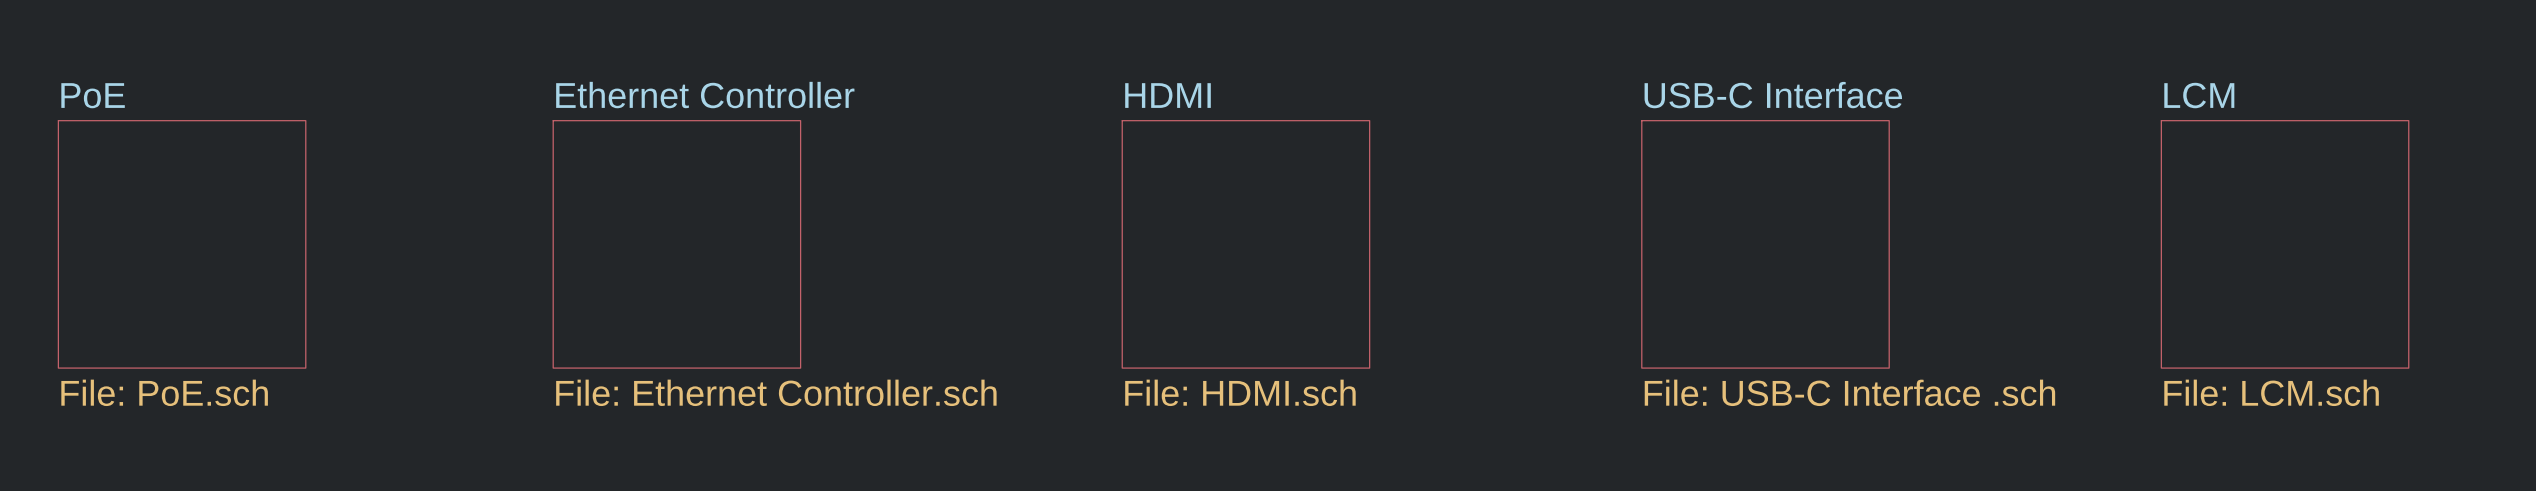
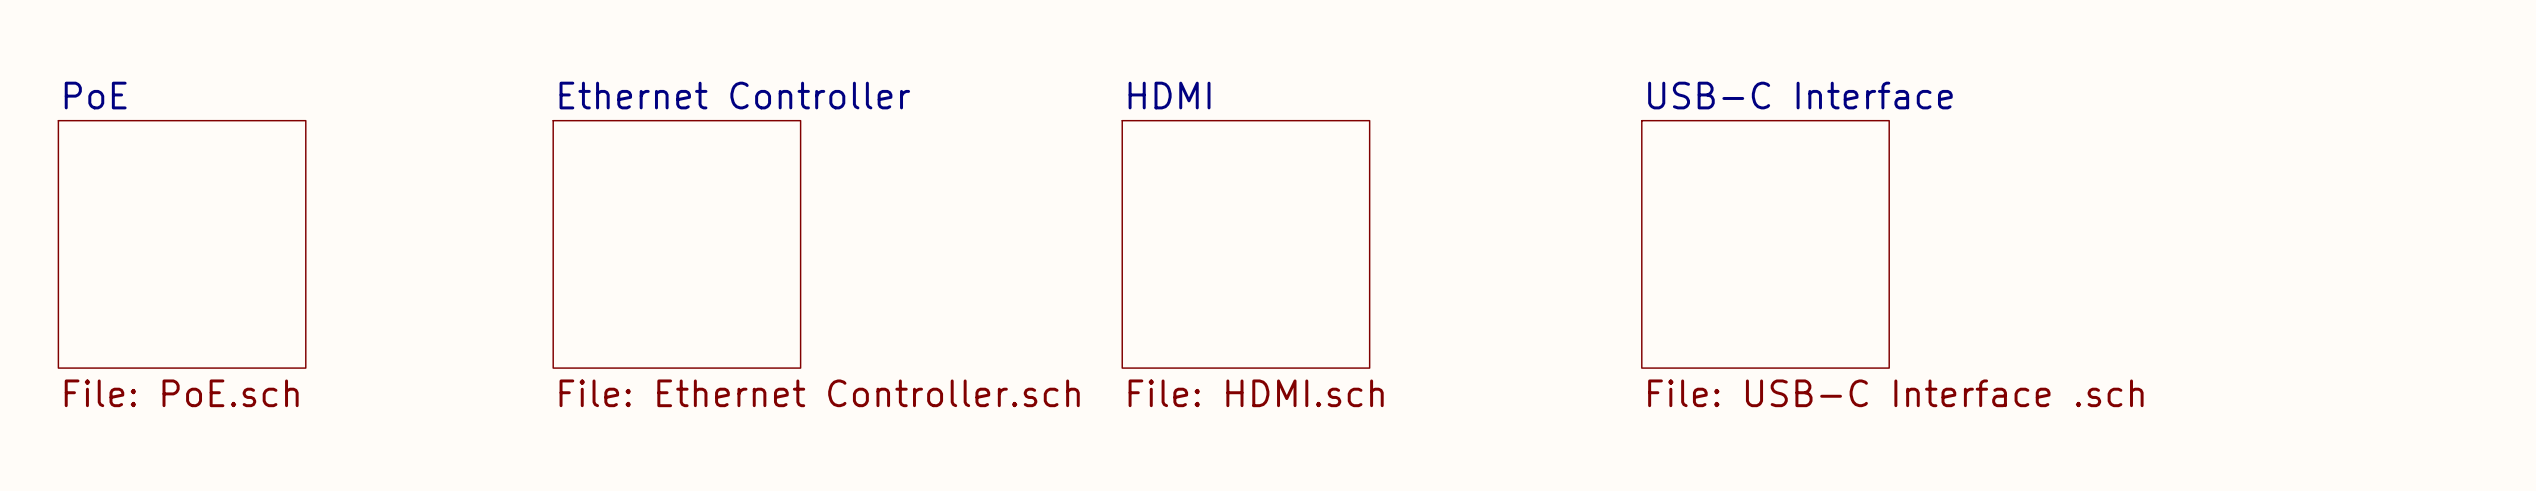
sheet LCM: File: LCM.sch (2285, 244) -> none

